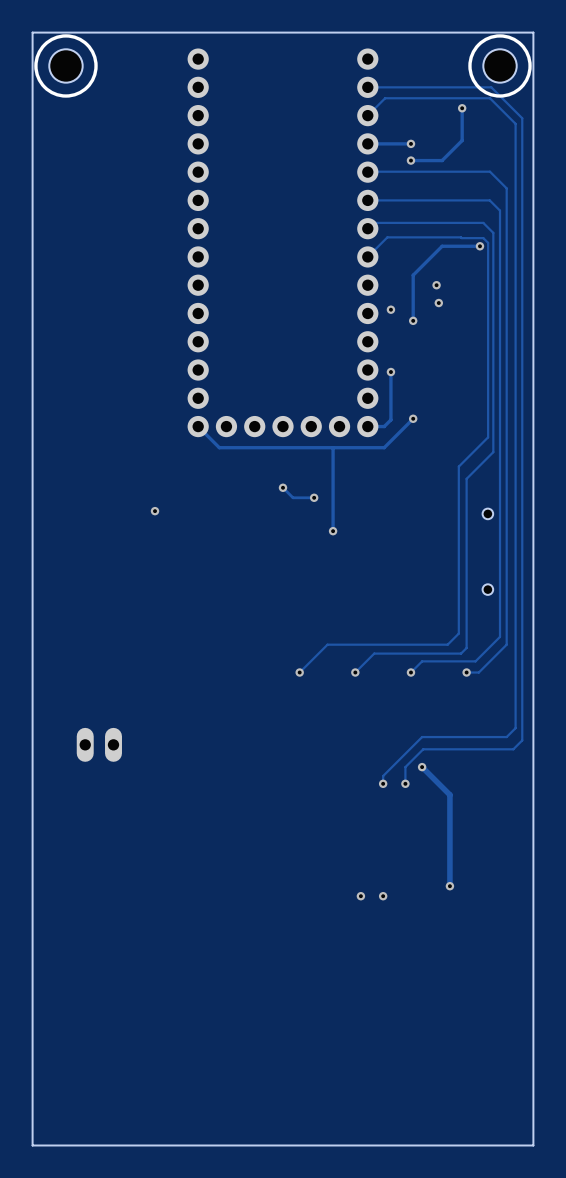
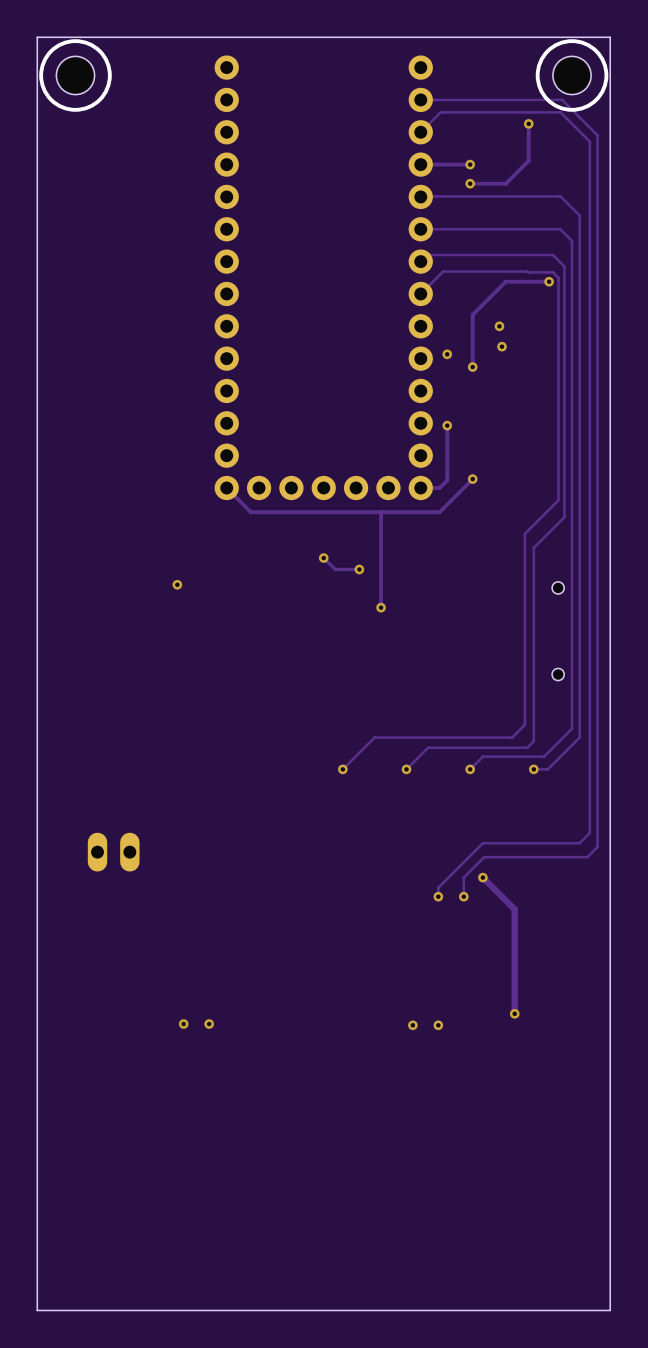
via: none -> (183, 1024)
via: none -> (209, 1024)

